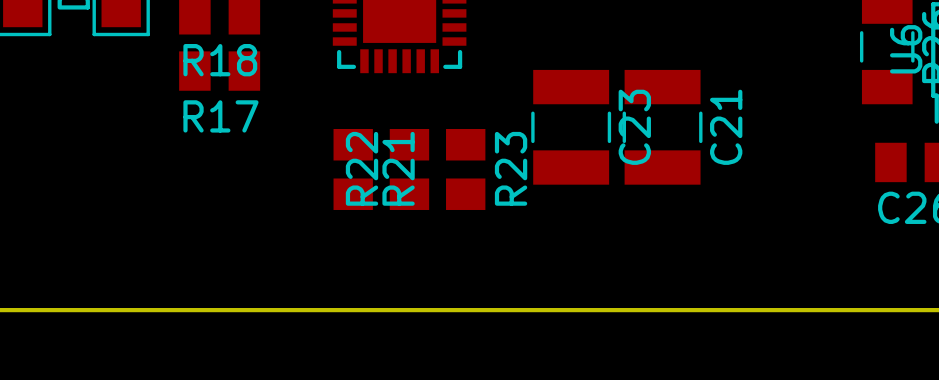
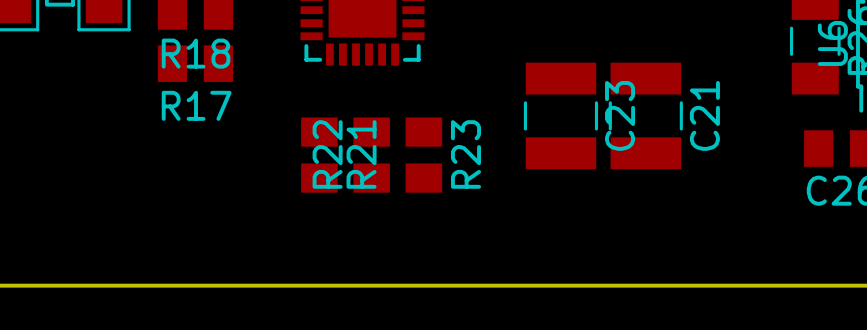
C23 position: (571, 127) -> (560, 115)
C21 position: (662, 127) -> (645, 115)

